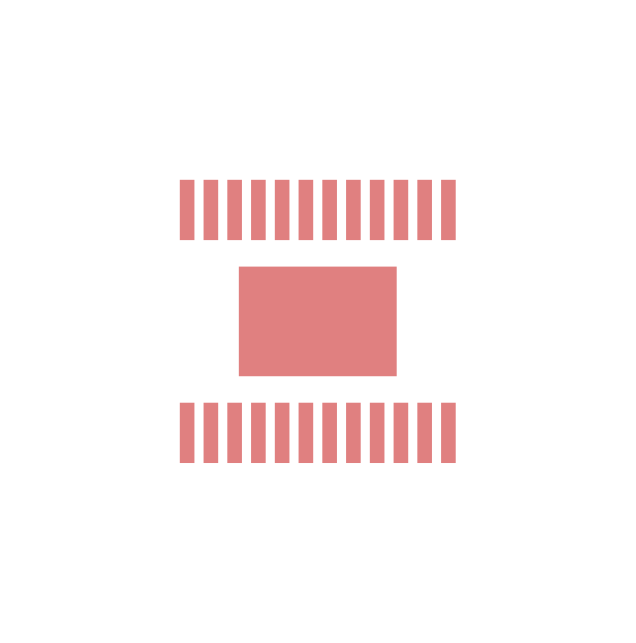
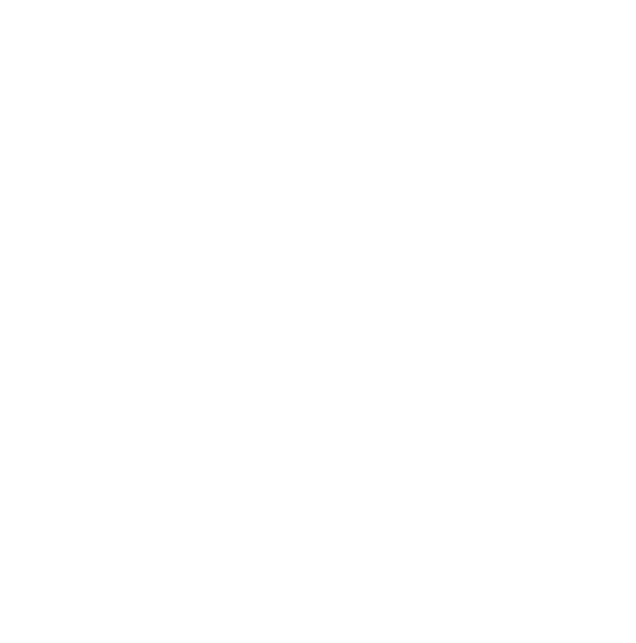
part: (317, 321) -> none

